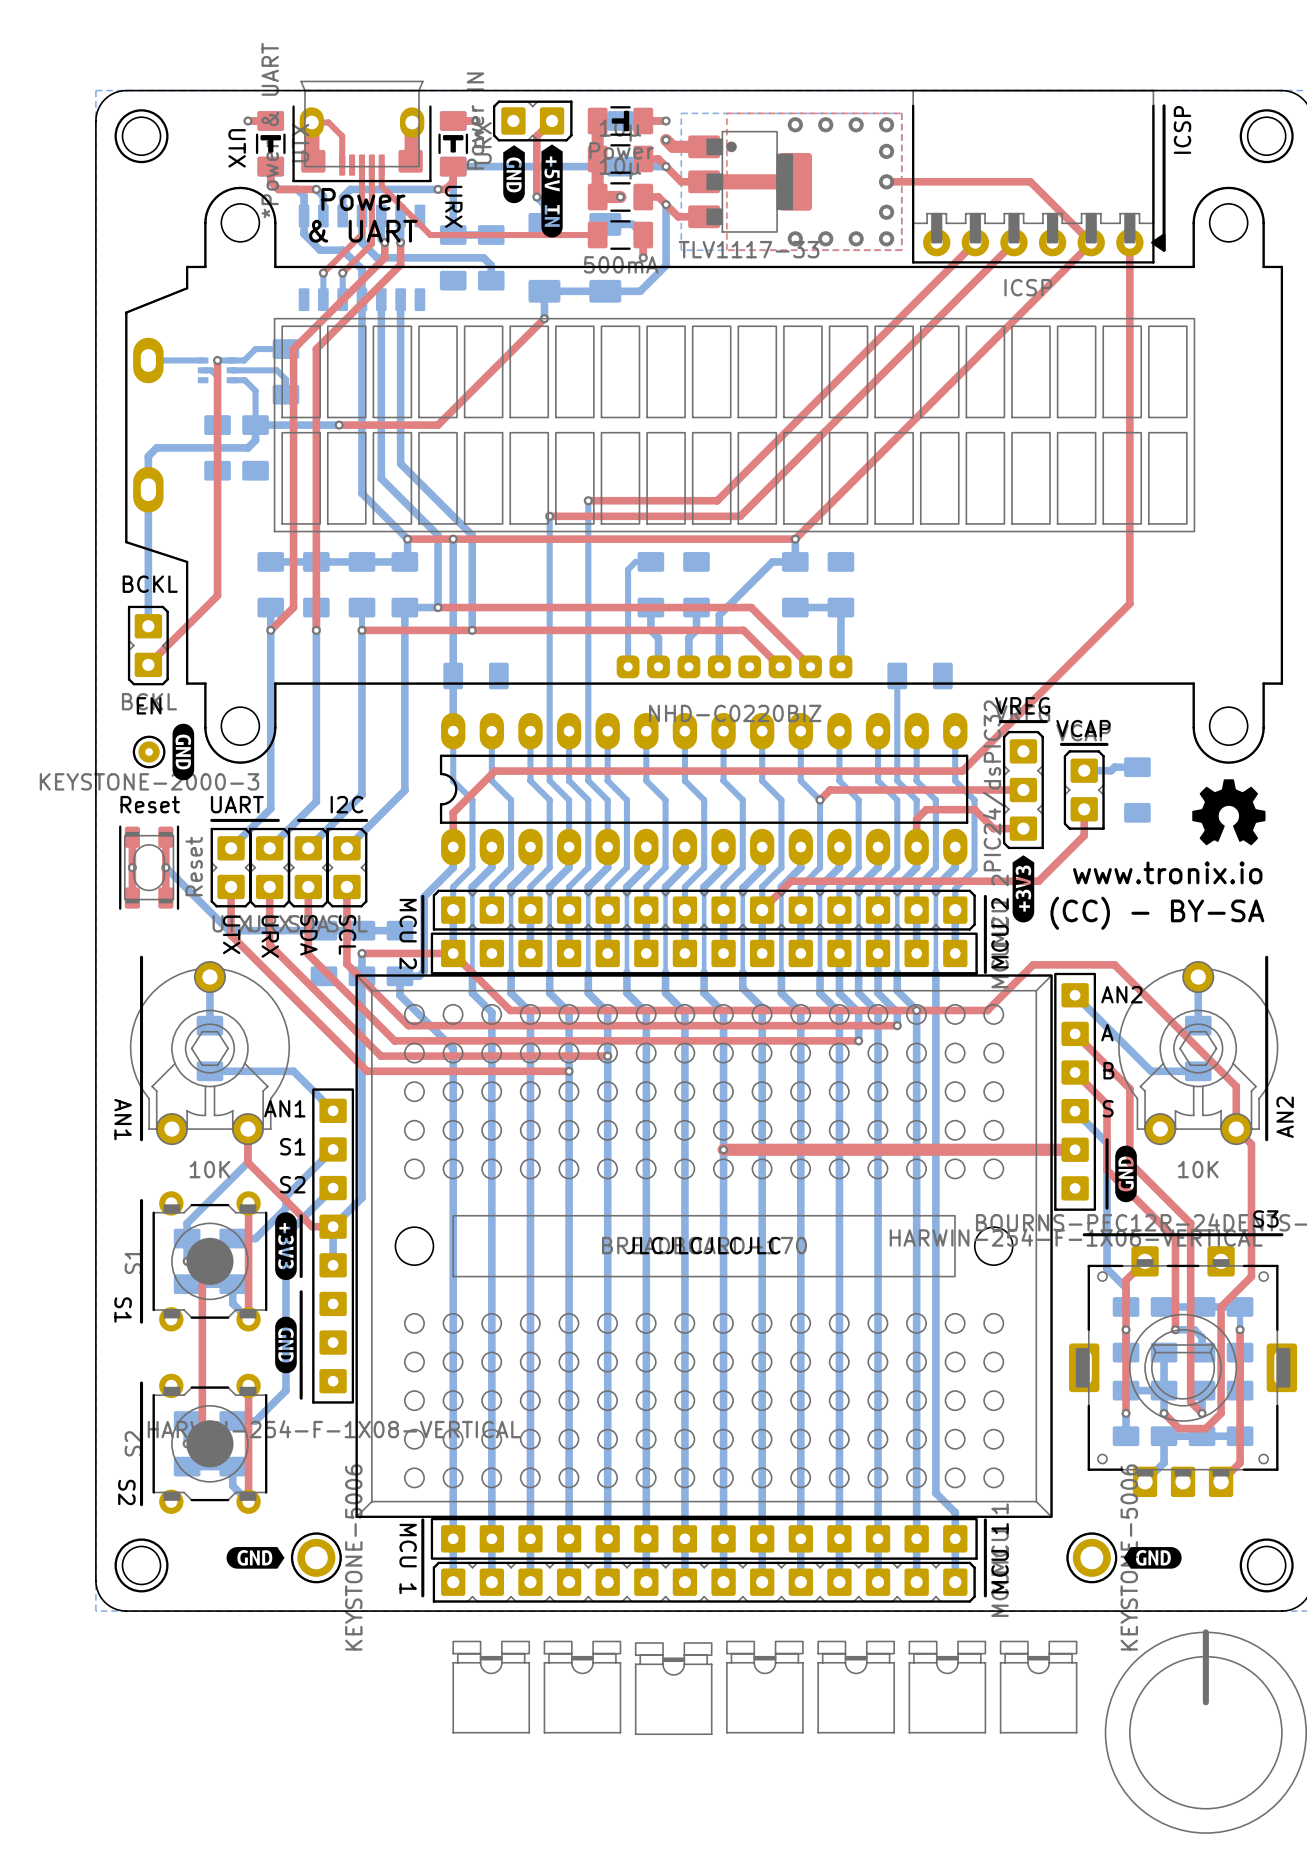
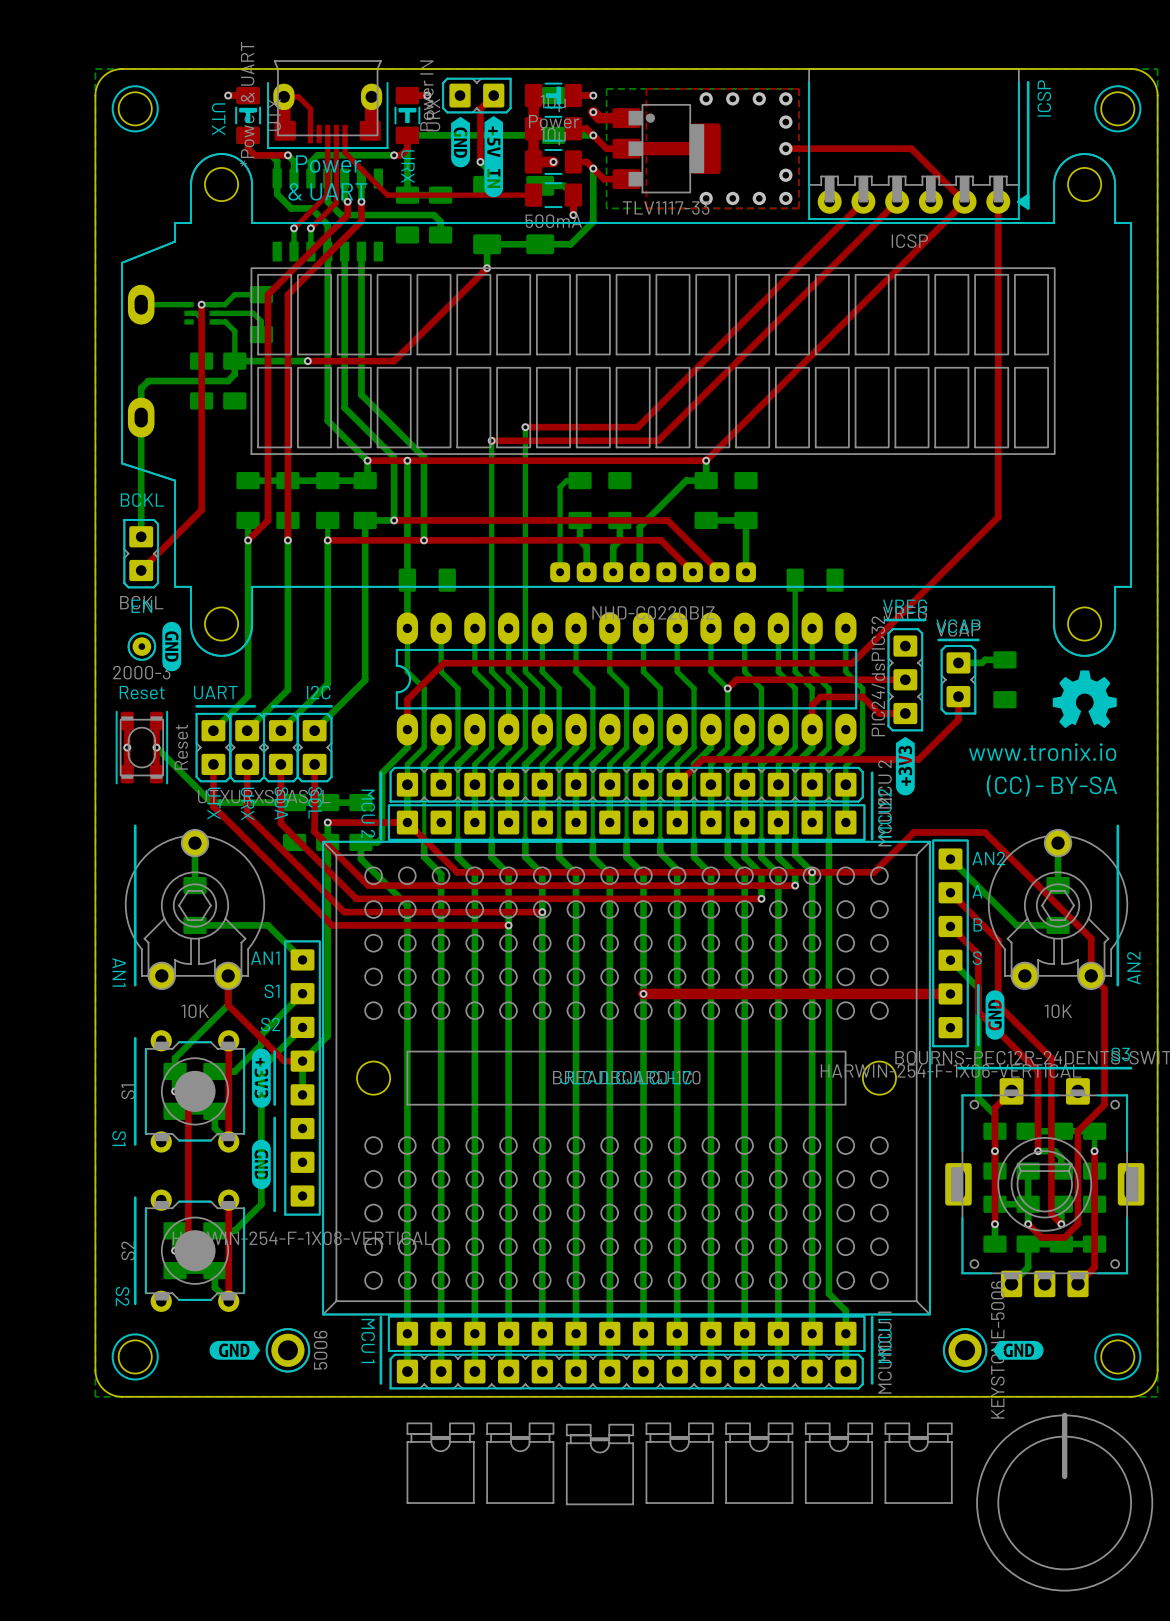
part value: KEYSTONE-2000-3 (149, 781) -> 2000-3 (141, 672)
part value: KEYSTONE-5006 (353, 1557) -> 5006 (320, 1350)

